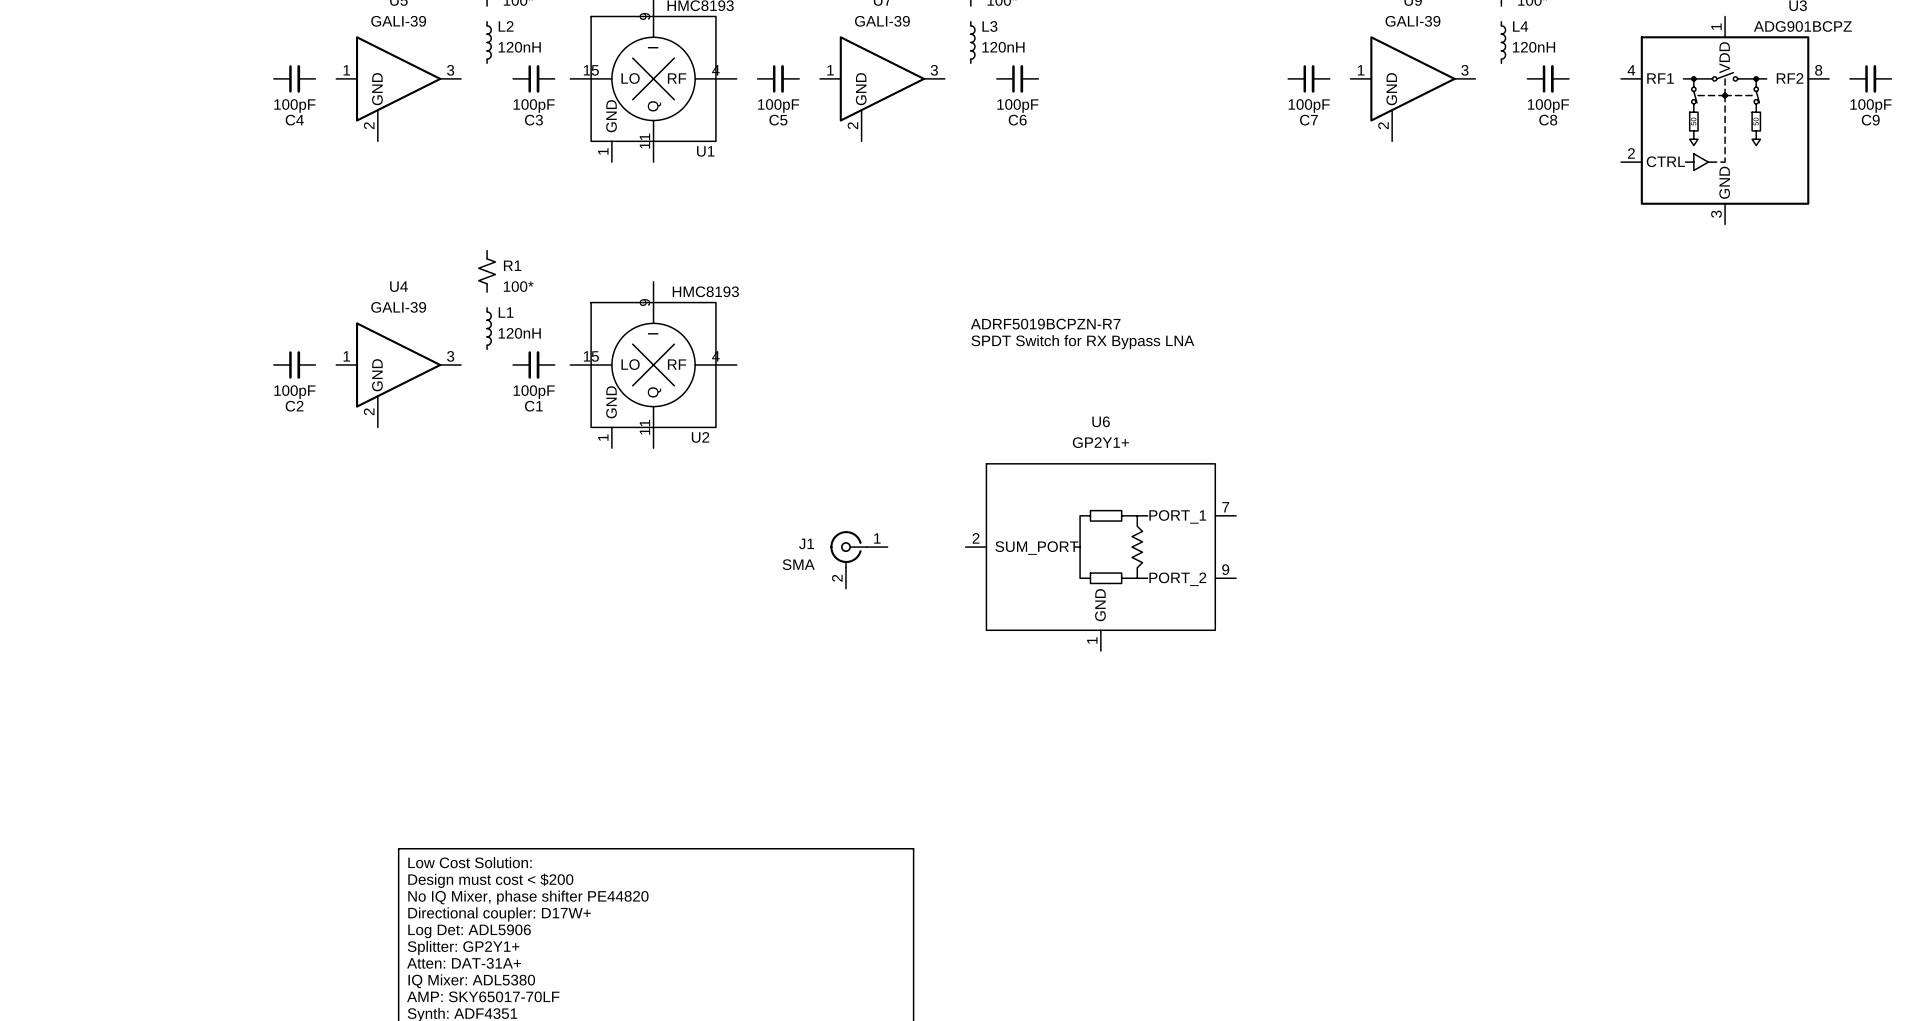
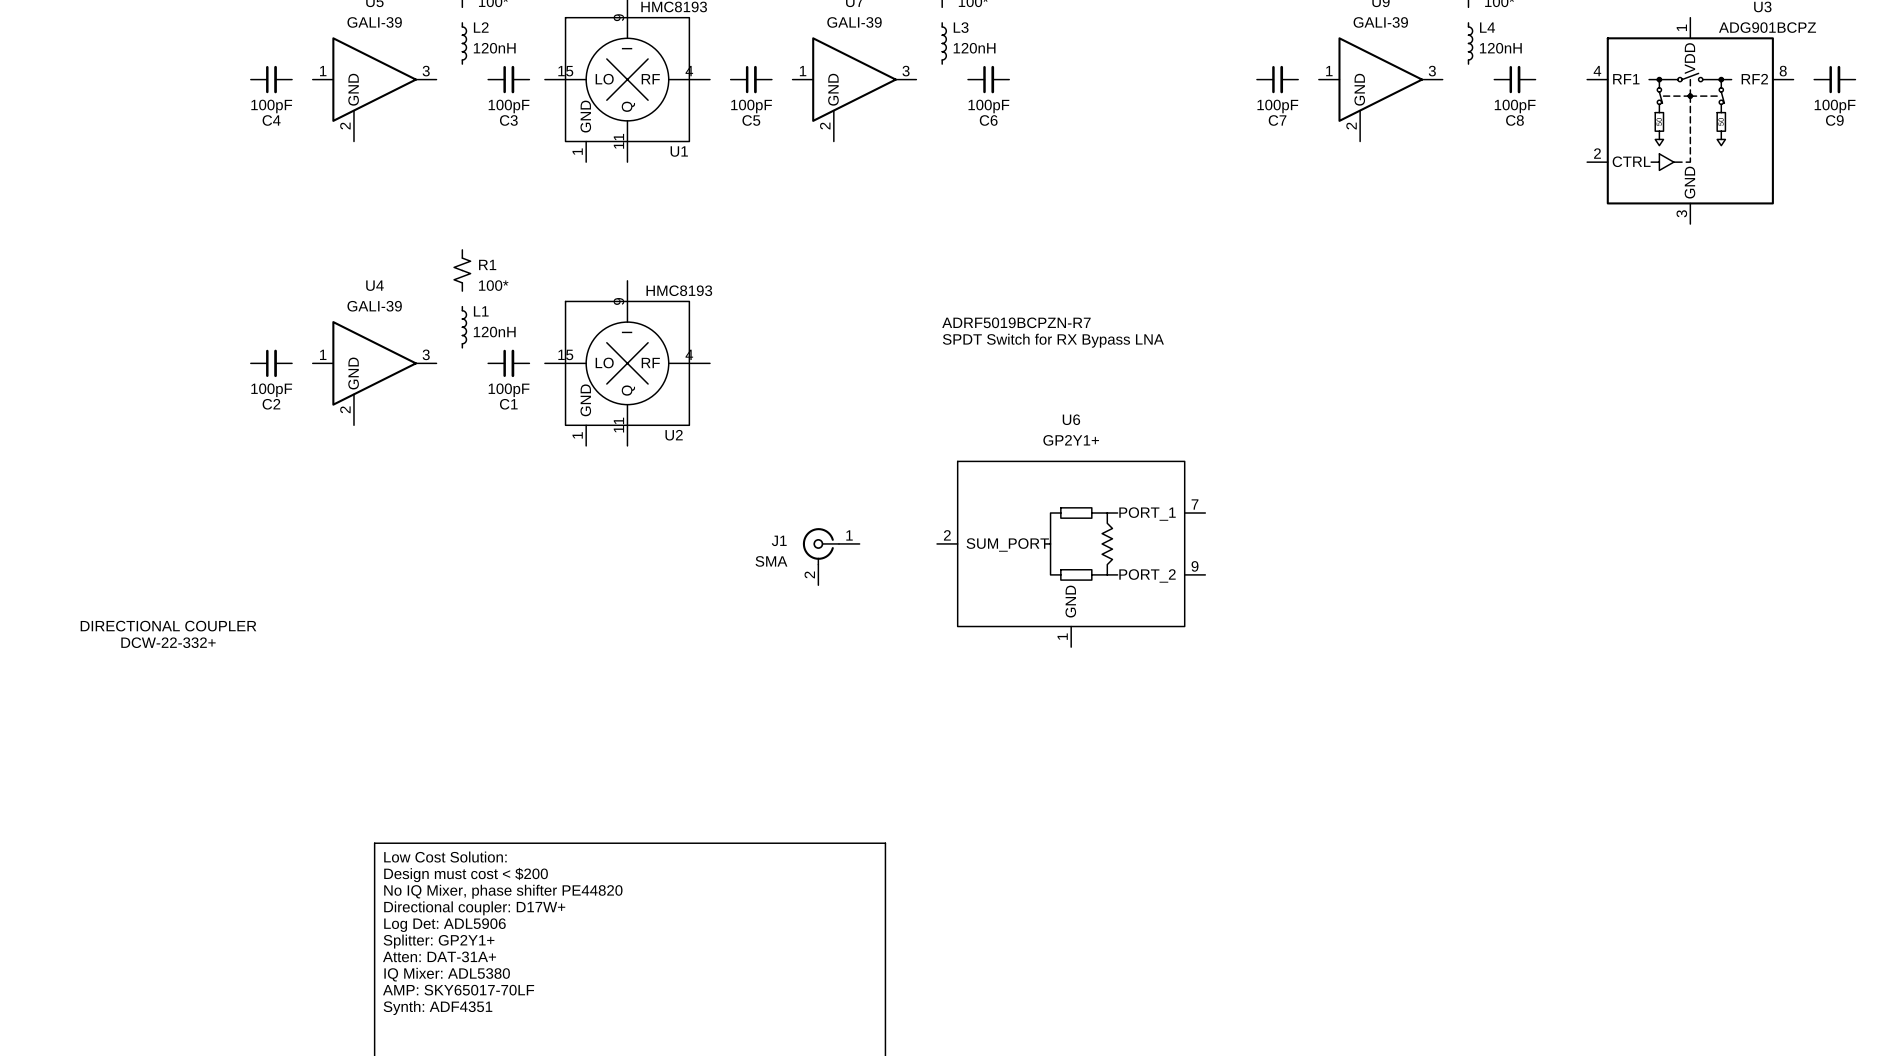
text: none -> DIRECTIONAL COUPLER (168, 626)
text: none -> DCW-22-332+ (168, 642)

